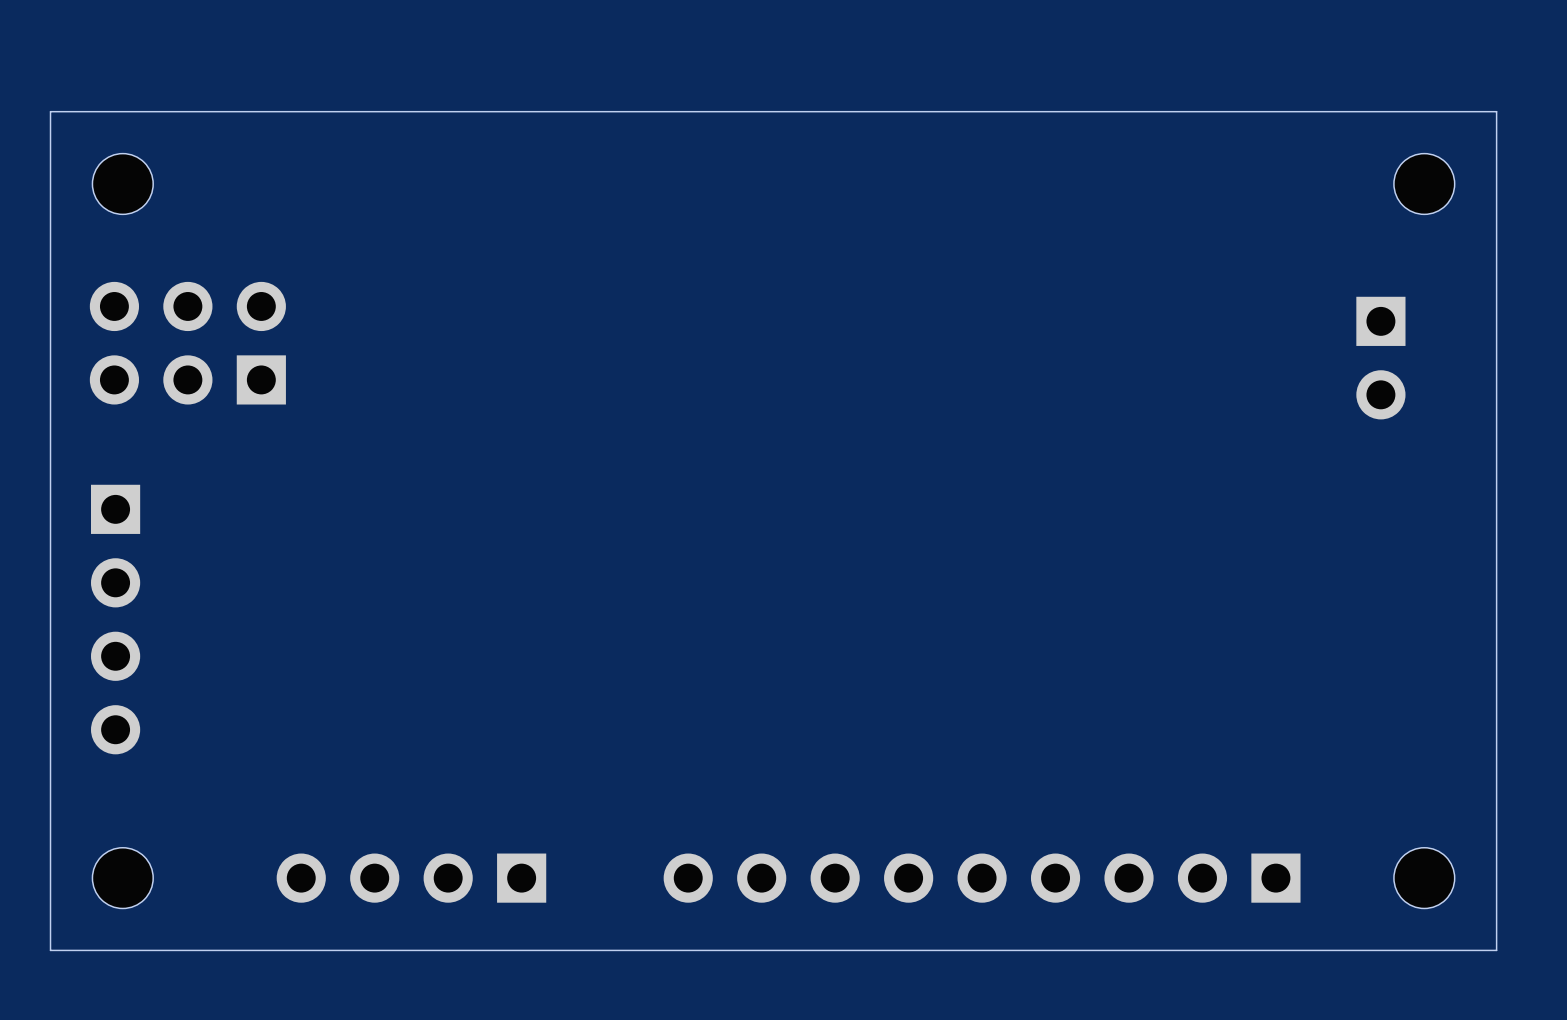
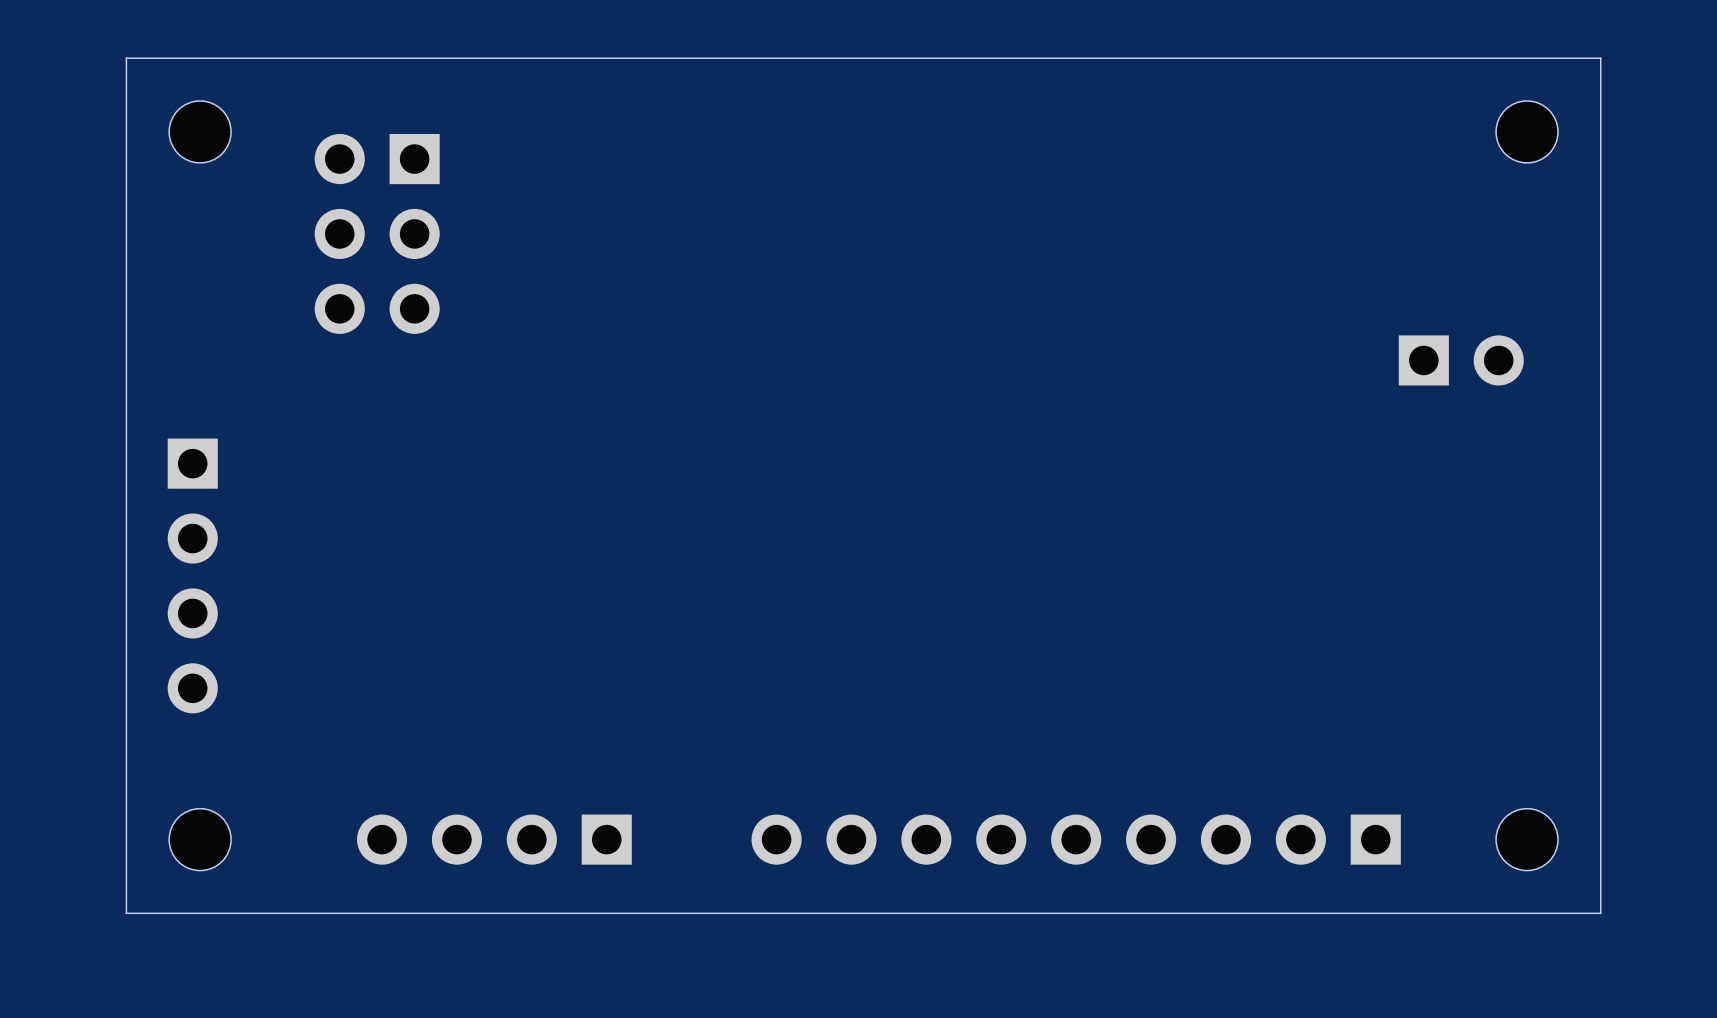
part rotation: 0° (187, 343) -> 90° counterclockwise (377, 233)
part position: (187, 343) -> (377, 233)
part rotation: 0° (1380, 358) -> 90° counterclockwise (1461, 360)

